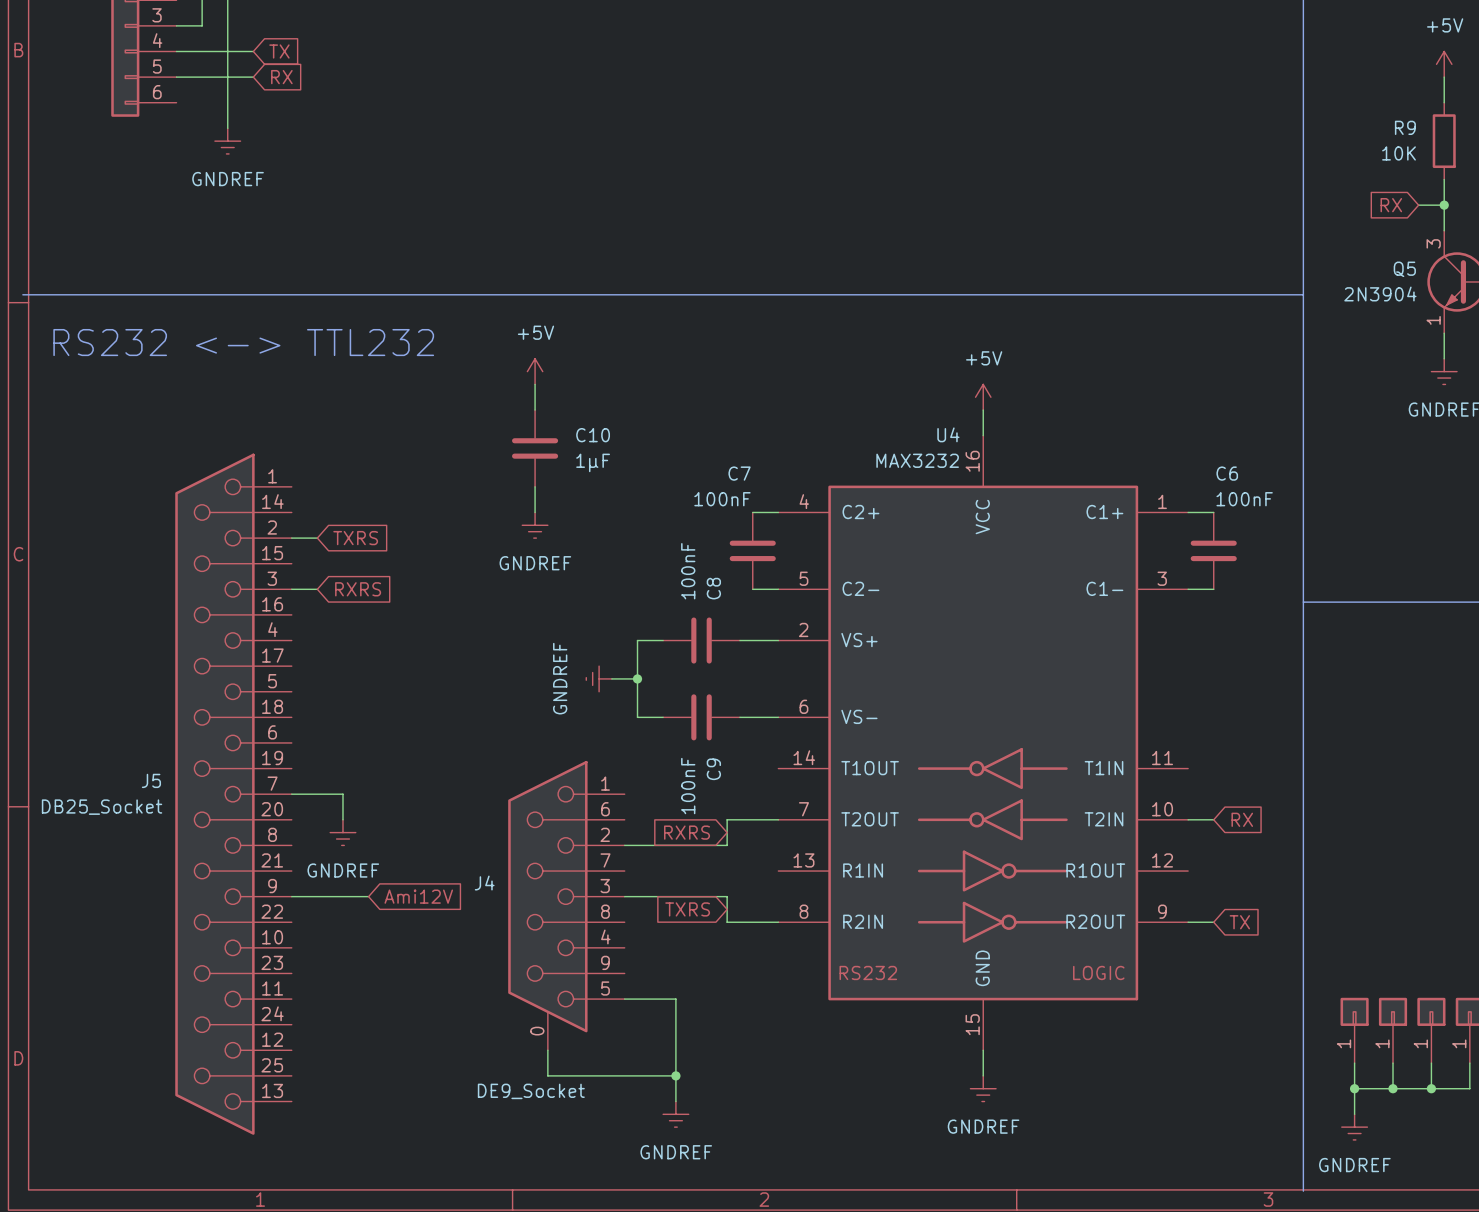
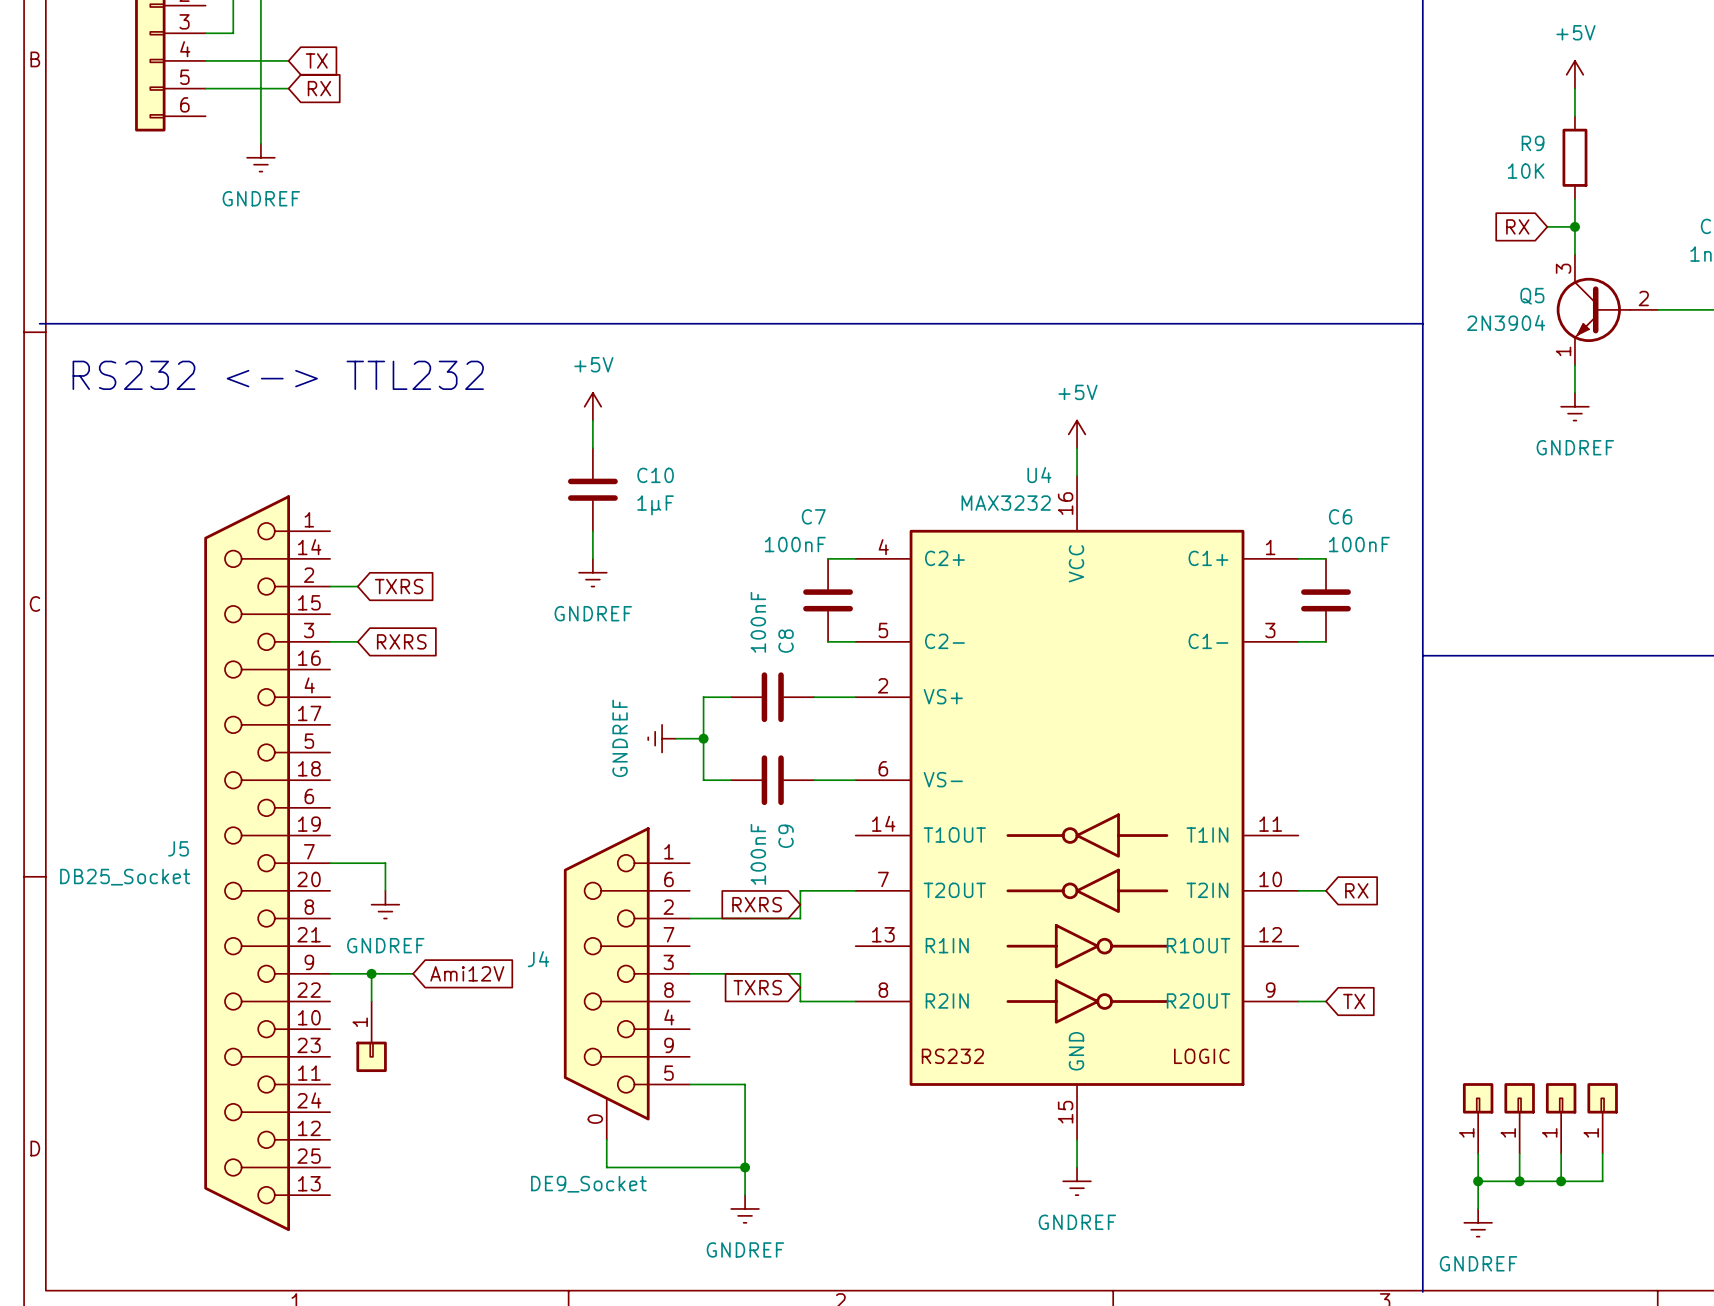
wire: none -> (371, 973) (371, 1001)
junction: none -> (371, 973)
part: none -> (371, 1036)

